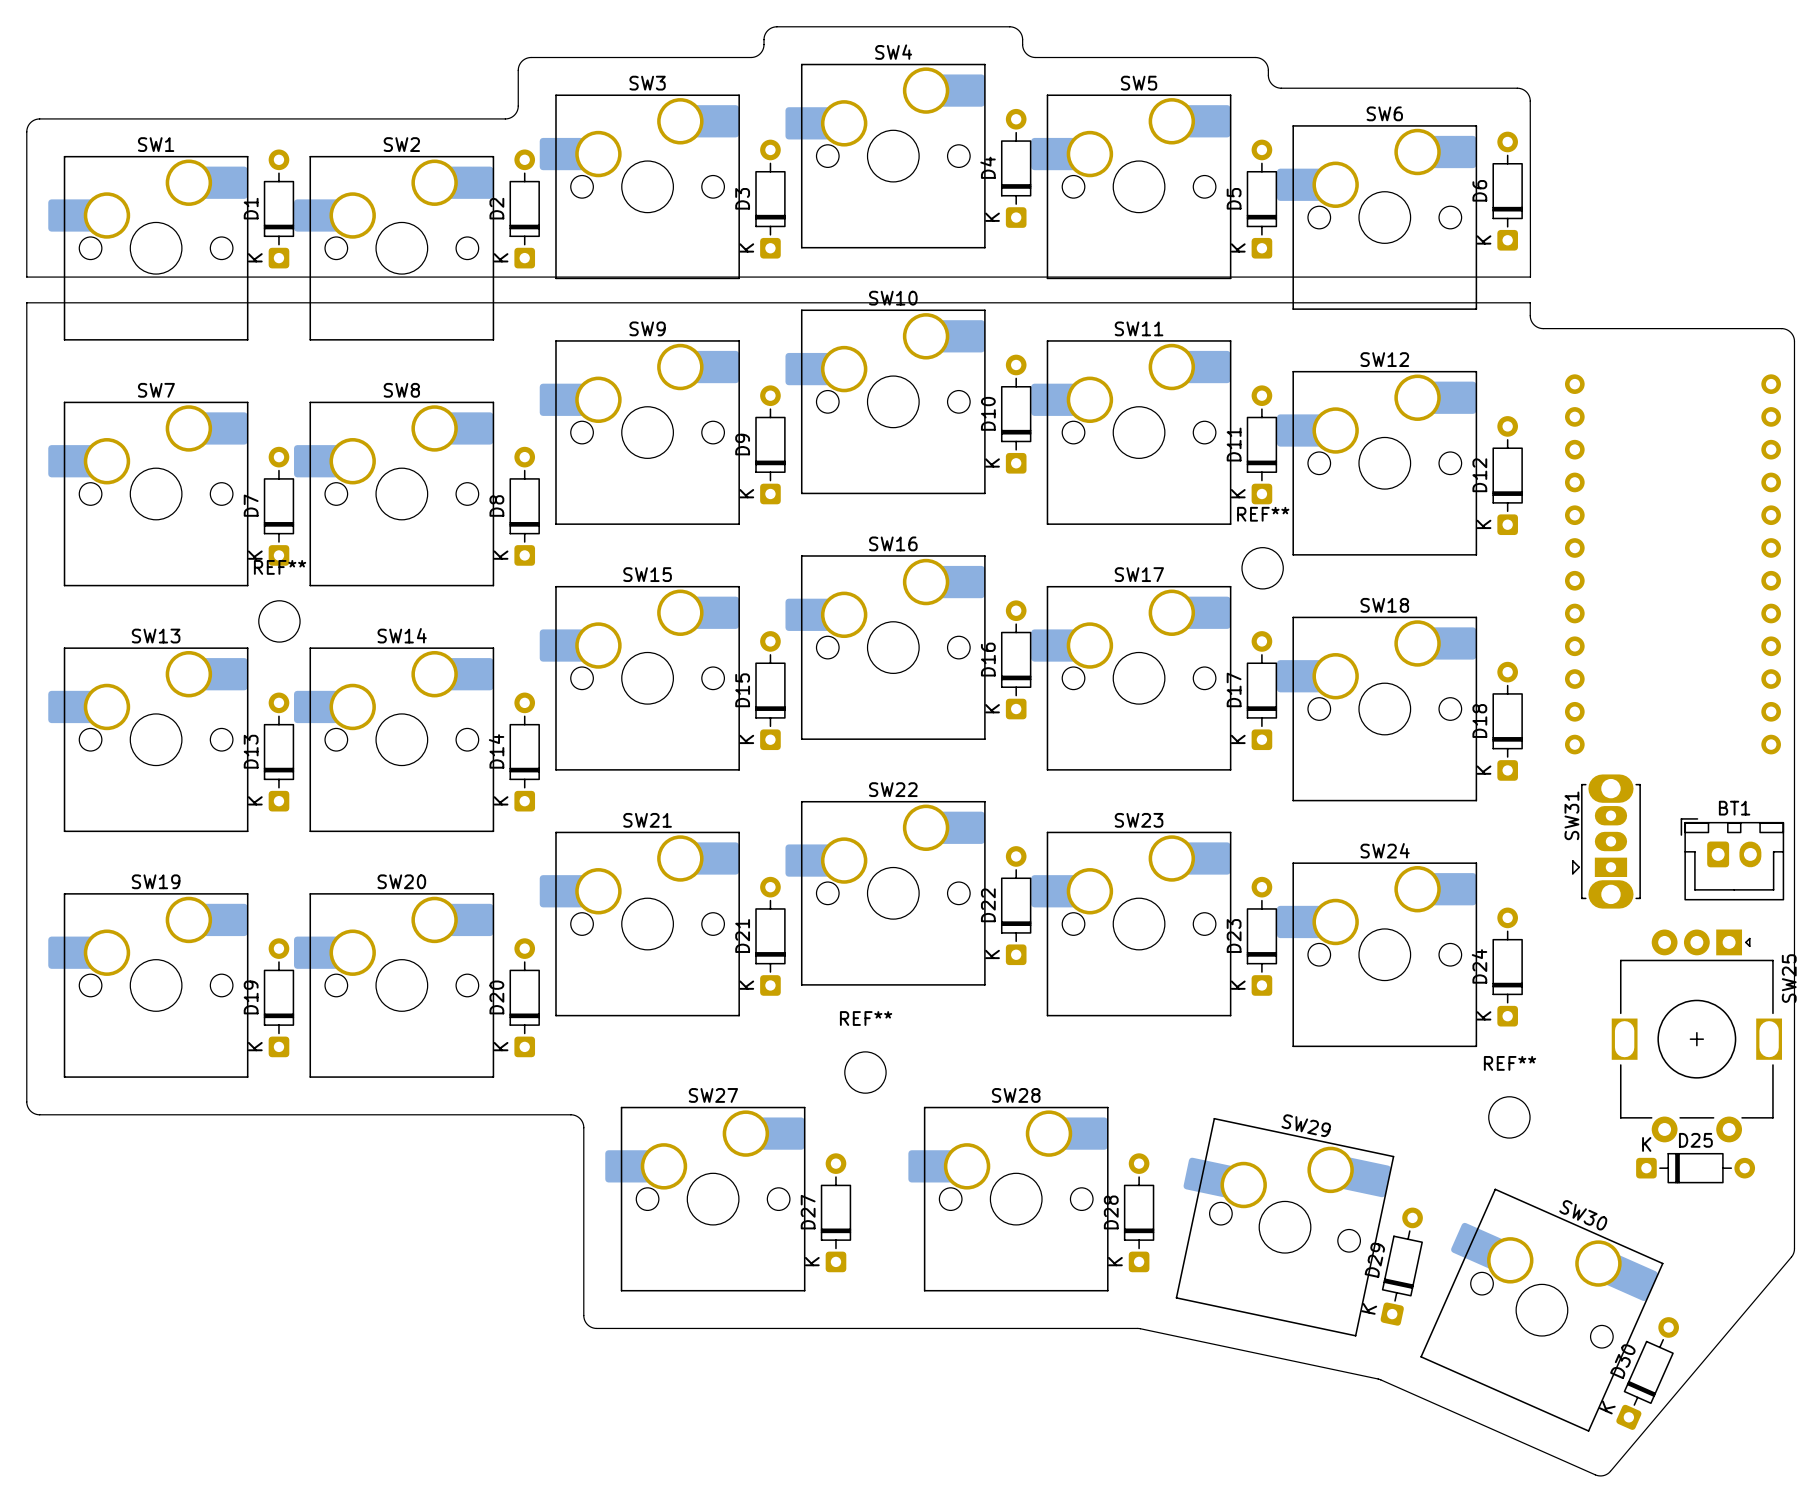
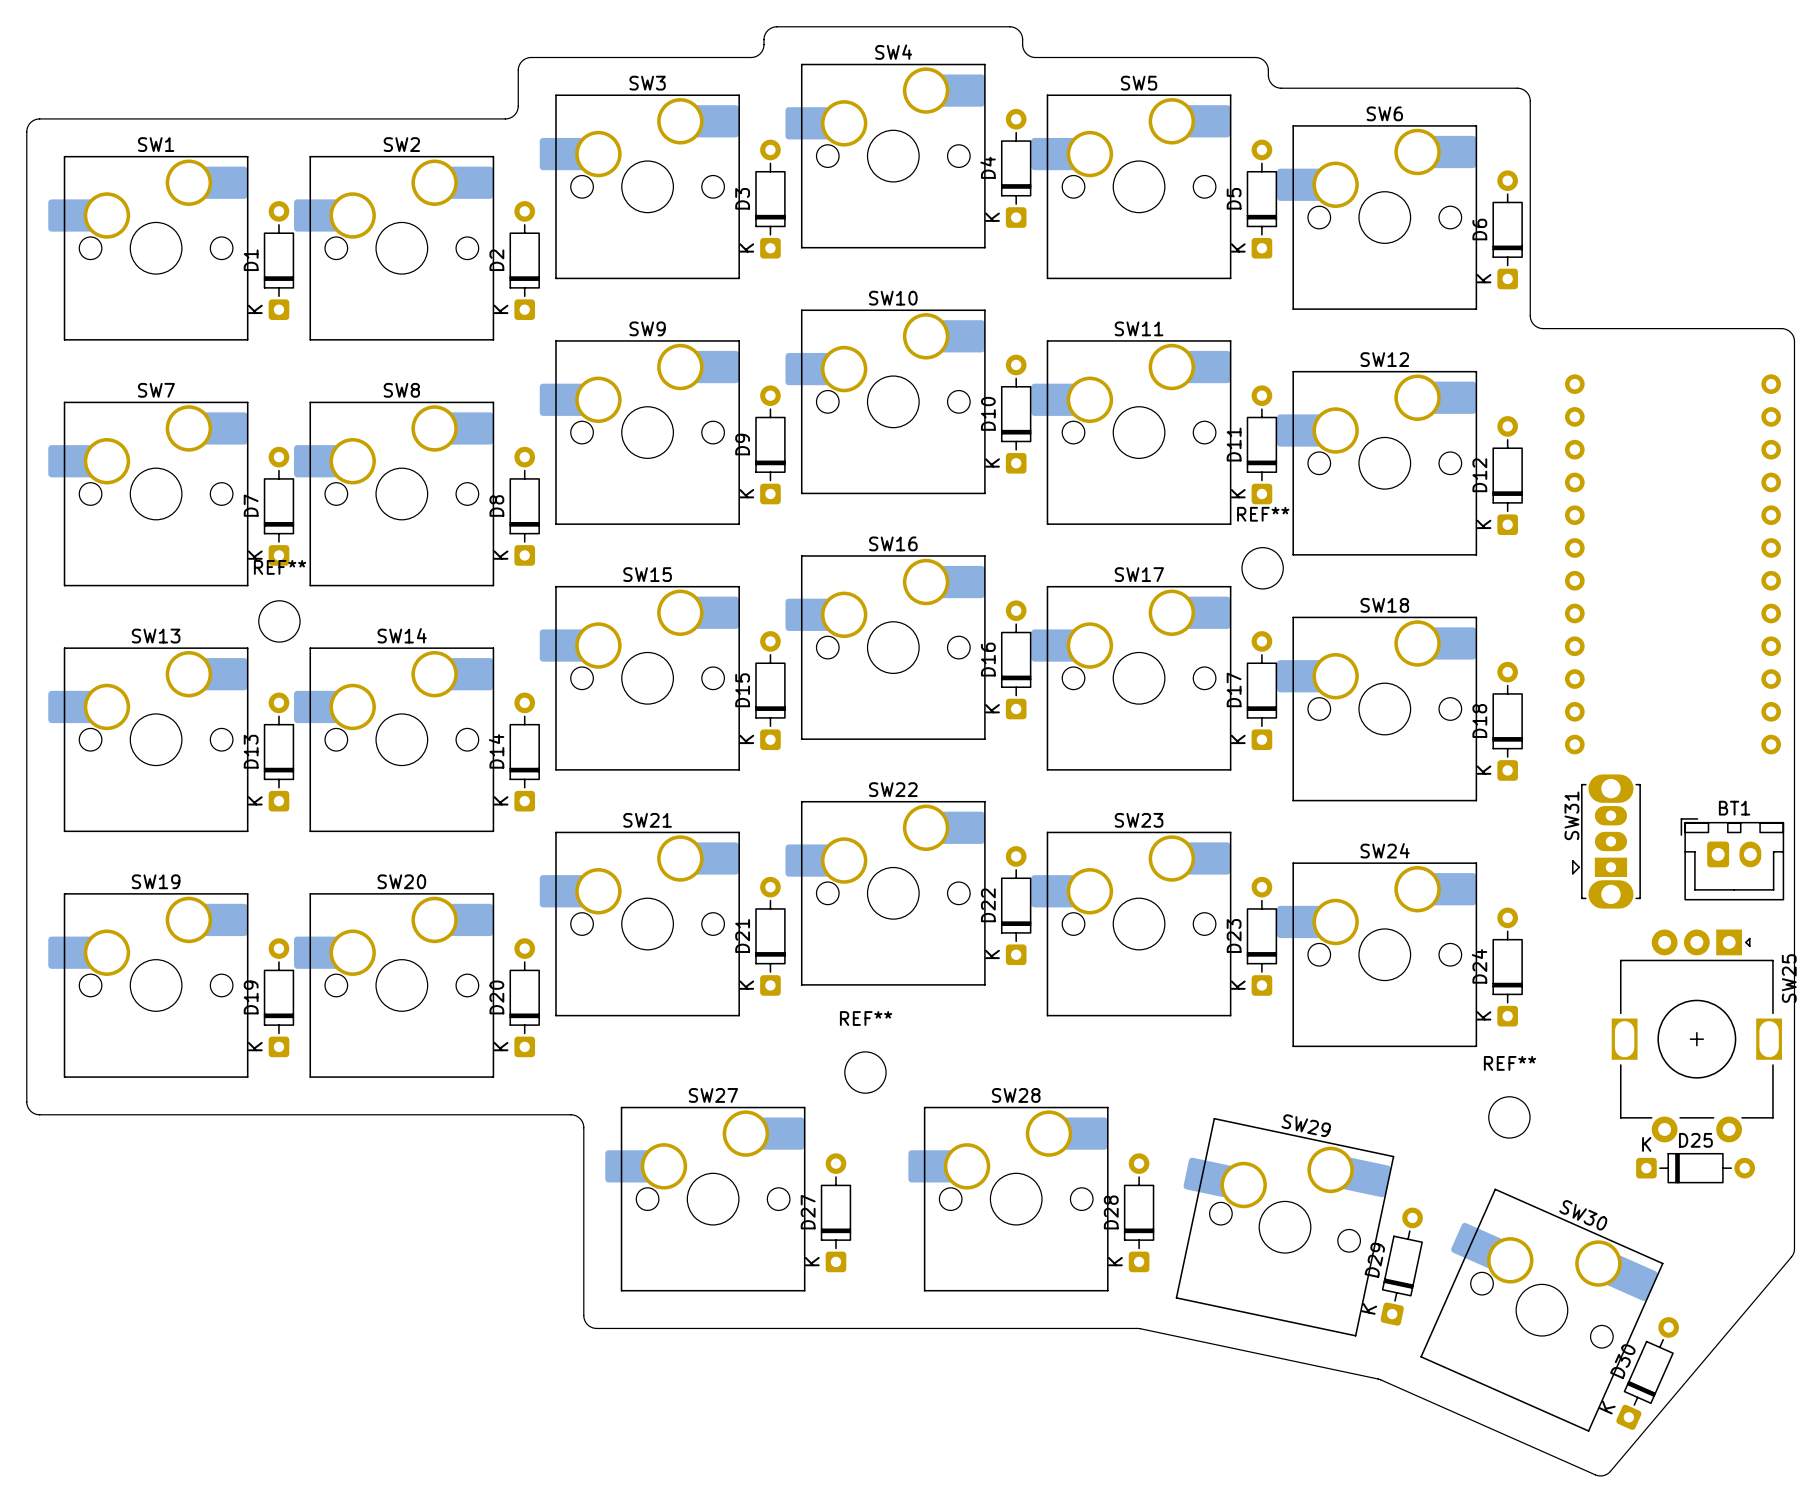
board edge: (1530, 101) (1530, 277) (26, 277) -> (1530, 101) (1530, 302)
D6 position: (1507, 191) -> (1507, 229)
D1 position: (278, 208) -> (278, 260)
D2 position: (524, 208) -> (524, 260)
board edge: (26, 302) (1530, 302) -> (26, 302) (26, 277)

